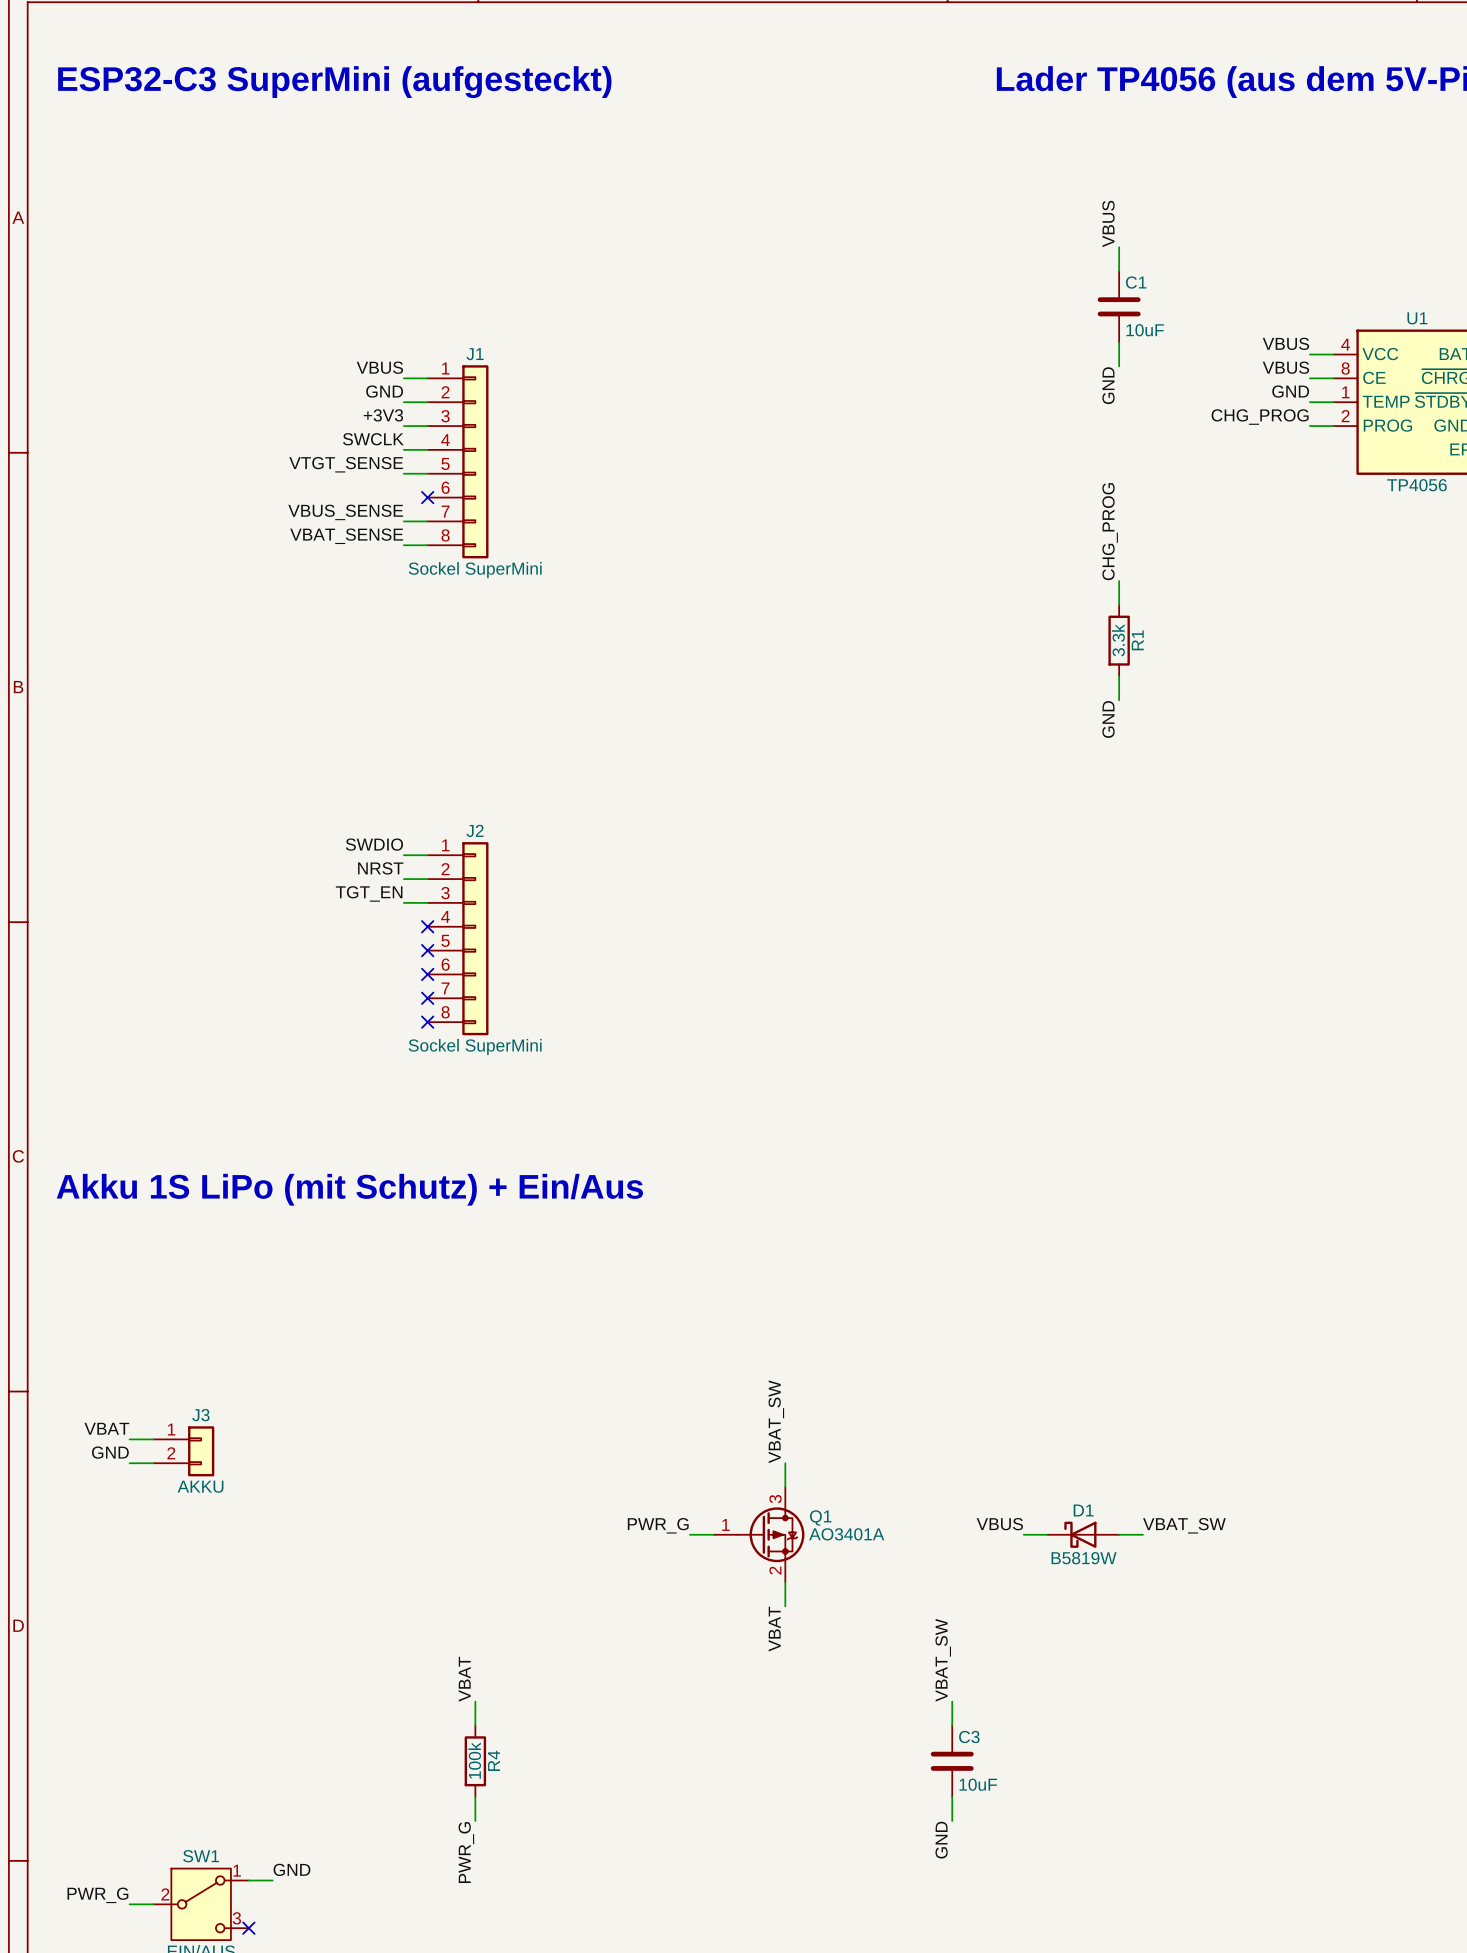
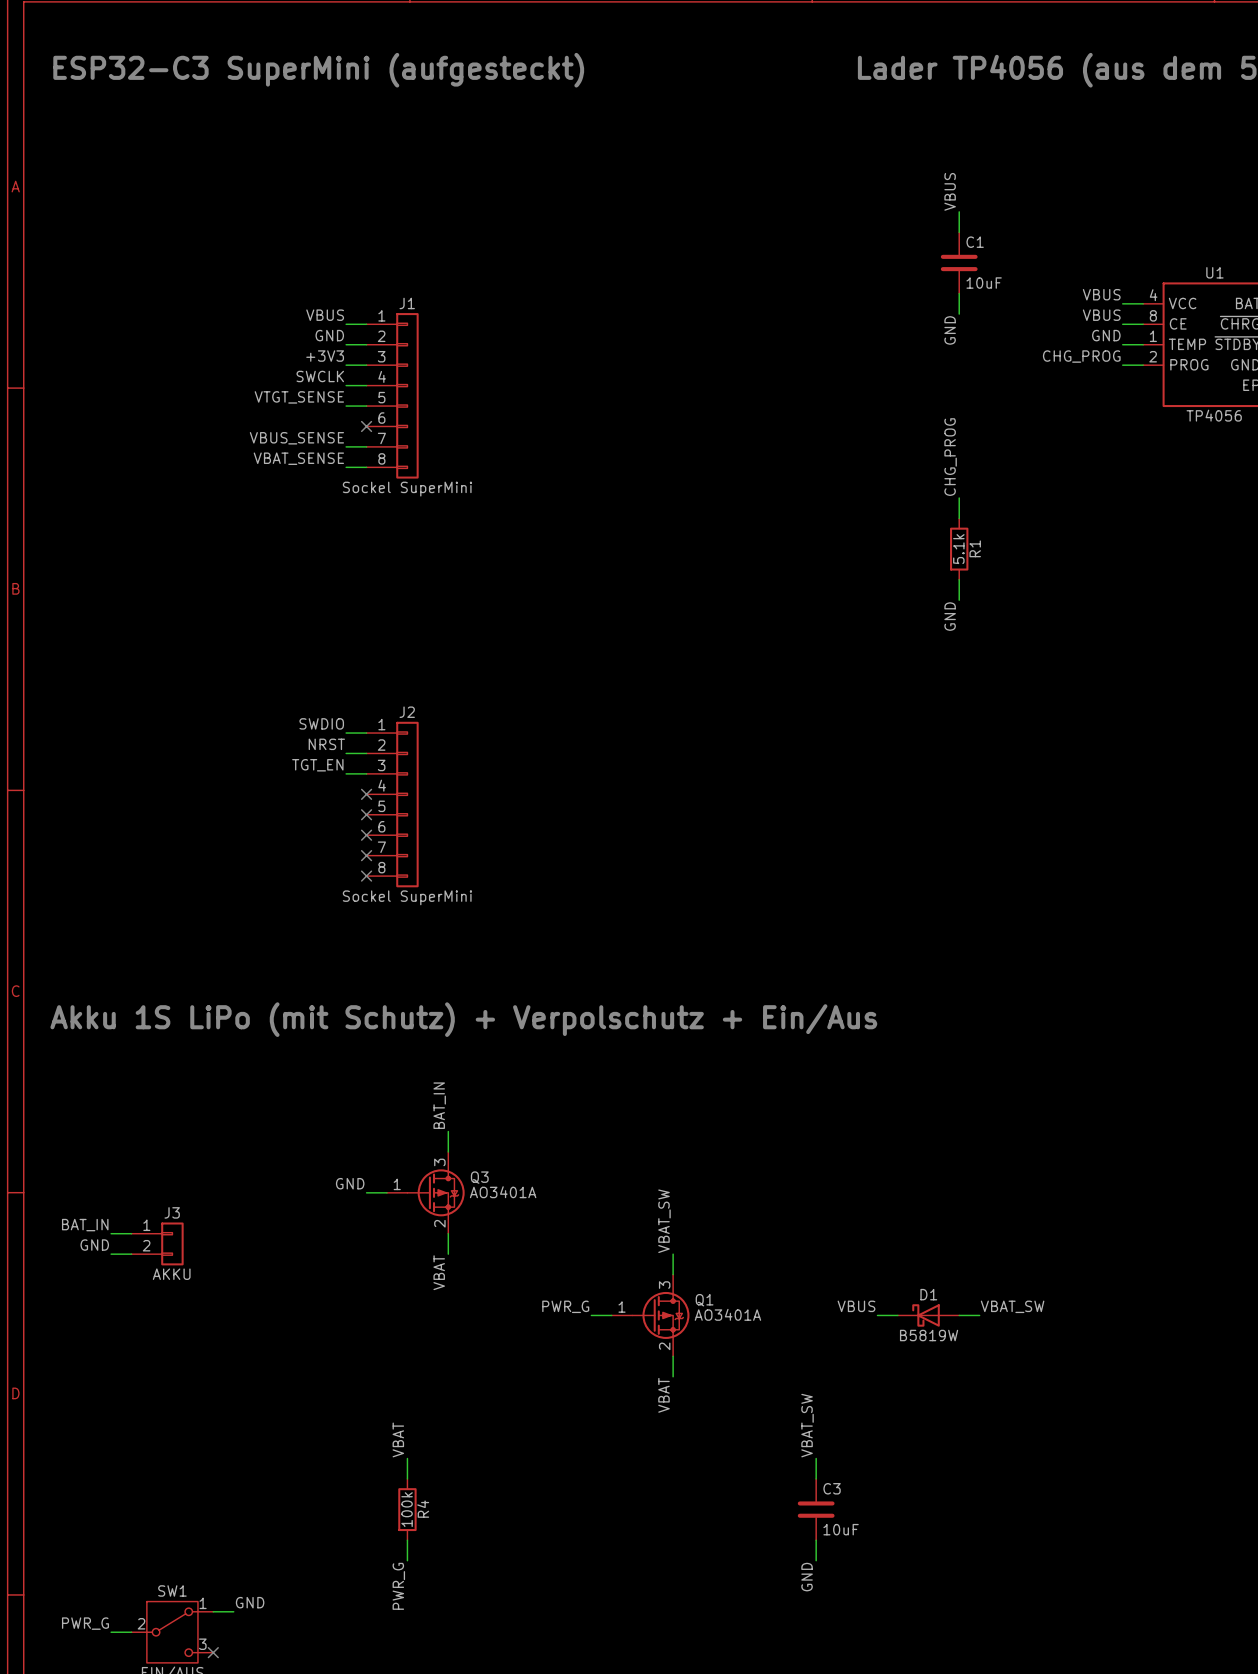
R1 value: 3.3k (1118, 640) -> 5.1k (958, 549)
text: Akku 1S LiPo (mit Schutz) + Ein/Aus (349, 1189) -> Akku 1S LiPo (mit Schutz) + Verpolschutz + Ein/Aus (463, 1019)
label: none -> BAT_IN (439, 1105)
wire: none -> (448, 1131) (448, 1151)
label: none -> GND (350, 1183)
wire: none -> (366, 1192) (387, 1192)
Q3: none -> AO3401A (425, 1192)
label: VBAT (106, 1428) -> BAT_IN (85, 1225)
wire: none -> (448, 1233) (448, 1254)
label: none -> VBAT (439, 1272)

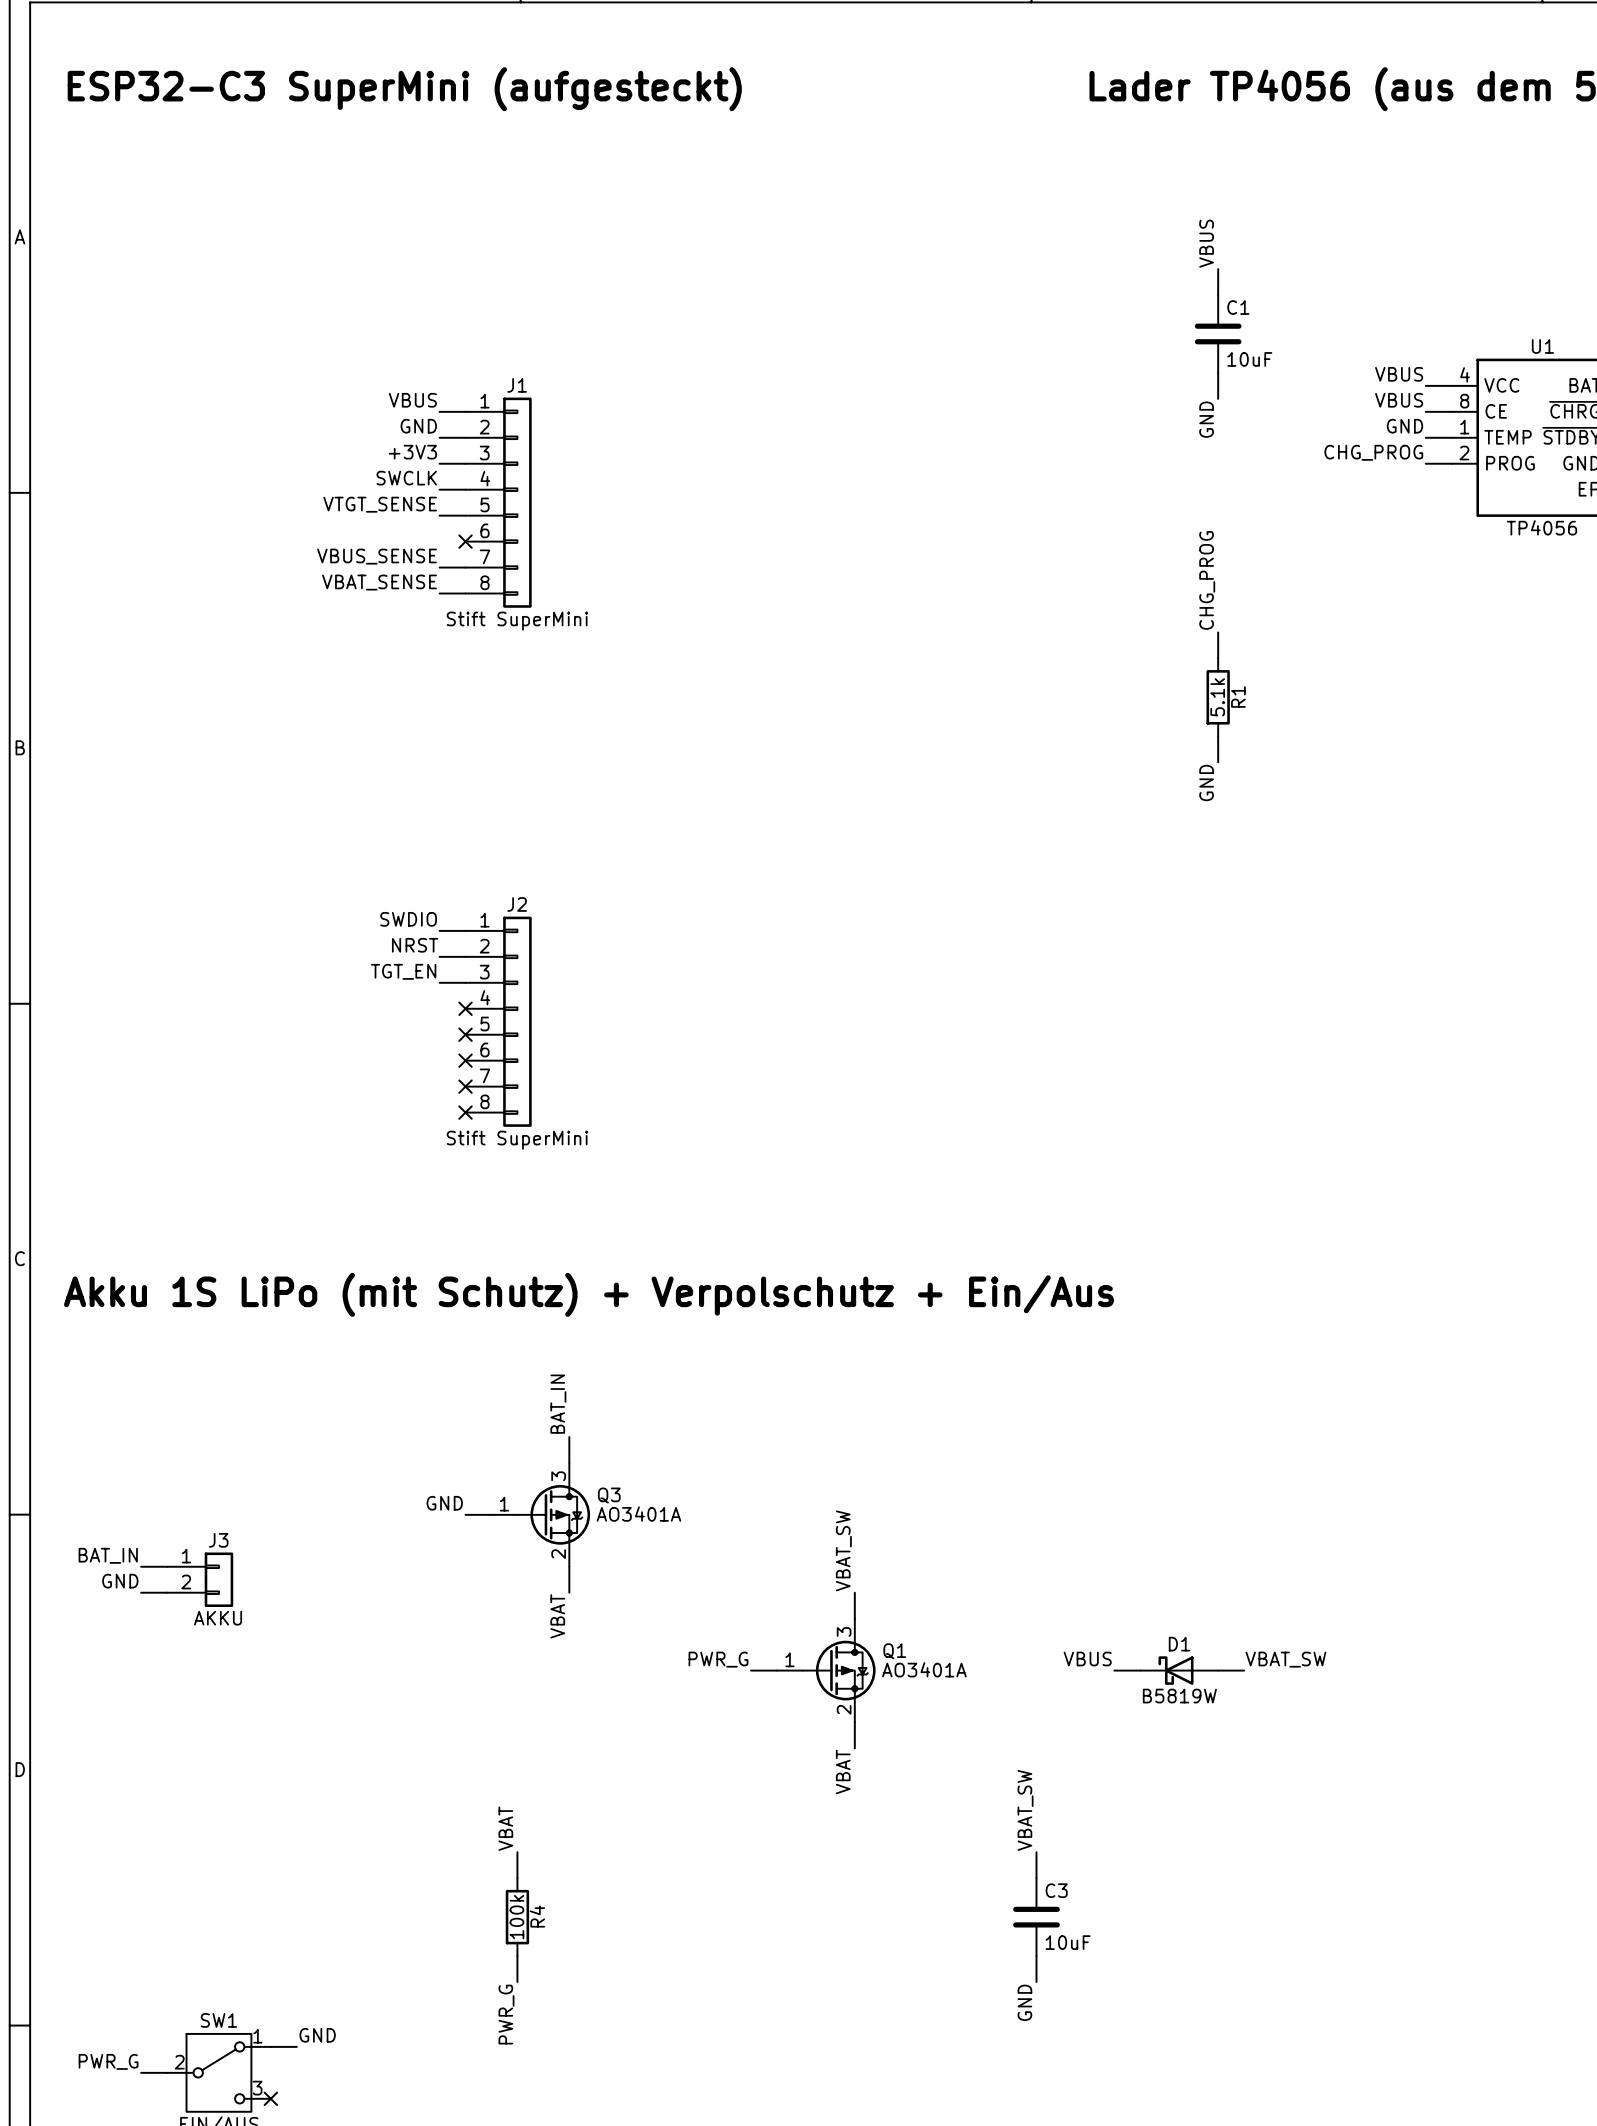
J1 value: Sockel SuperMini (407, 489) -> Stift SuperMini (517, 621)
J2 value: Sockel SuperMini (407, 897) -> Stift SuperMini (517, 1140)

